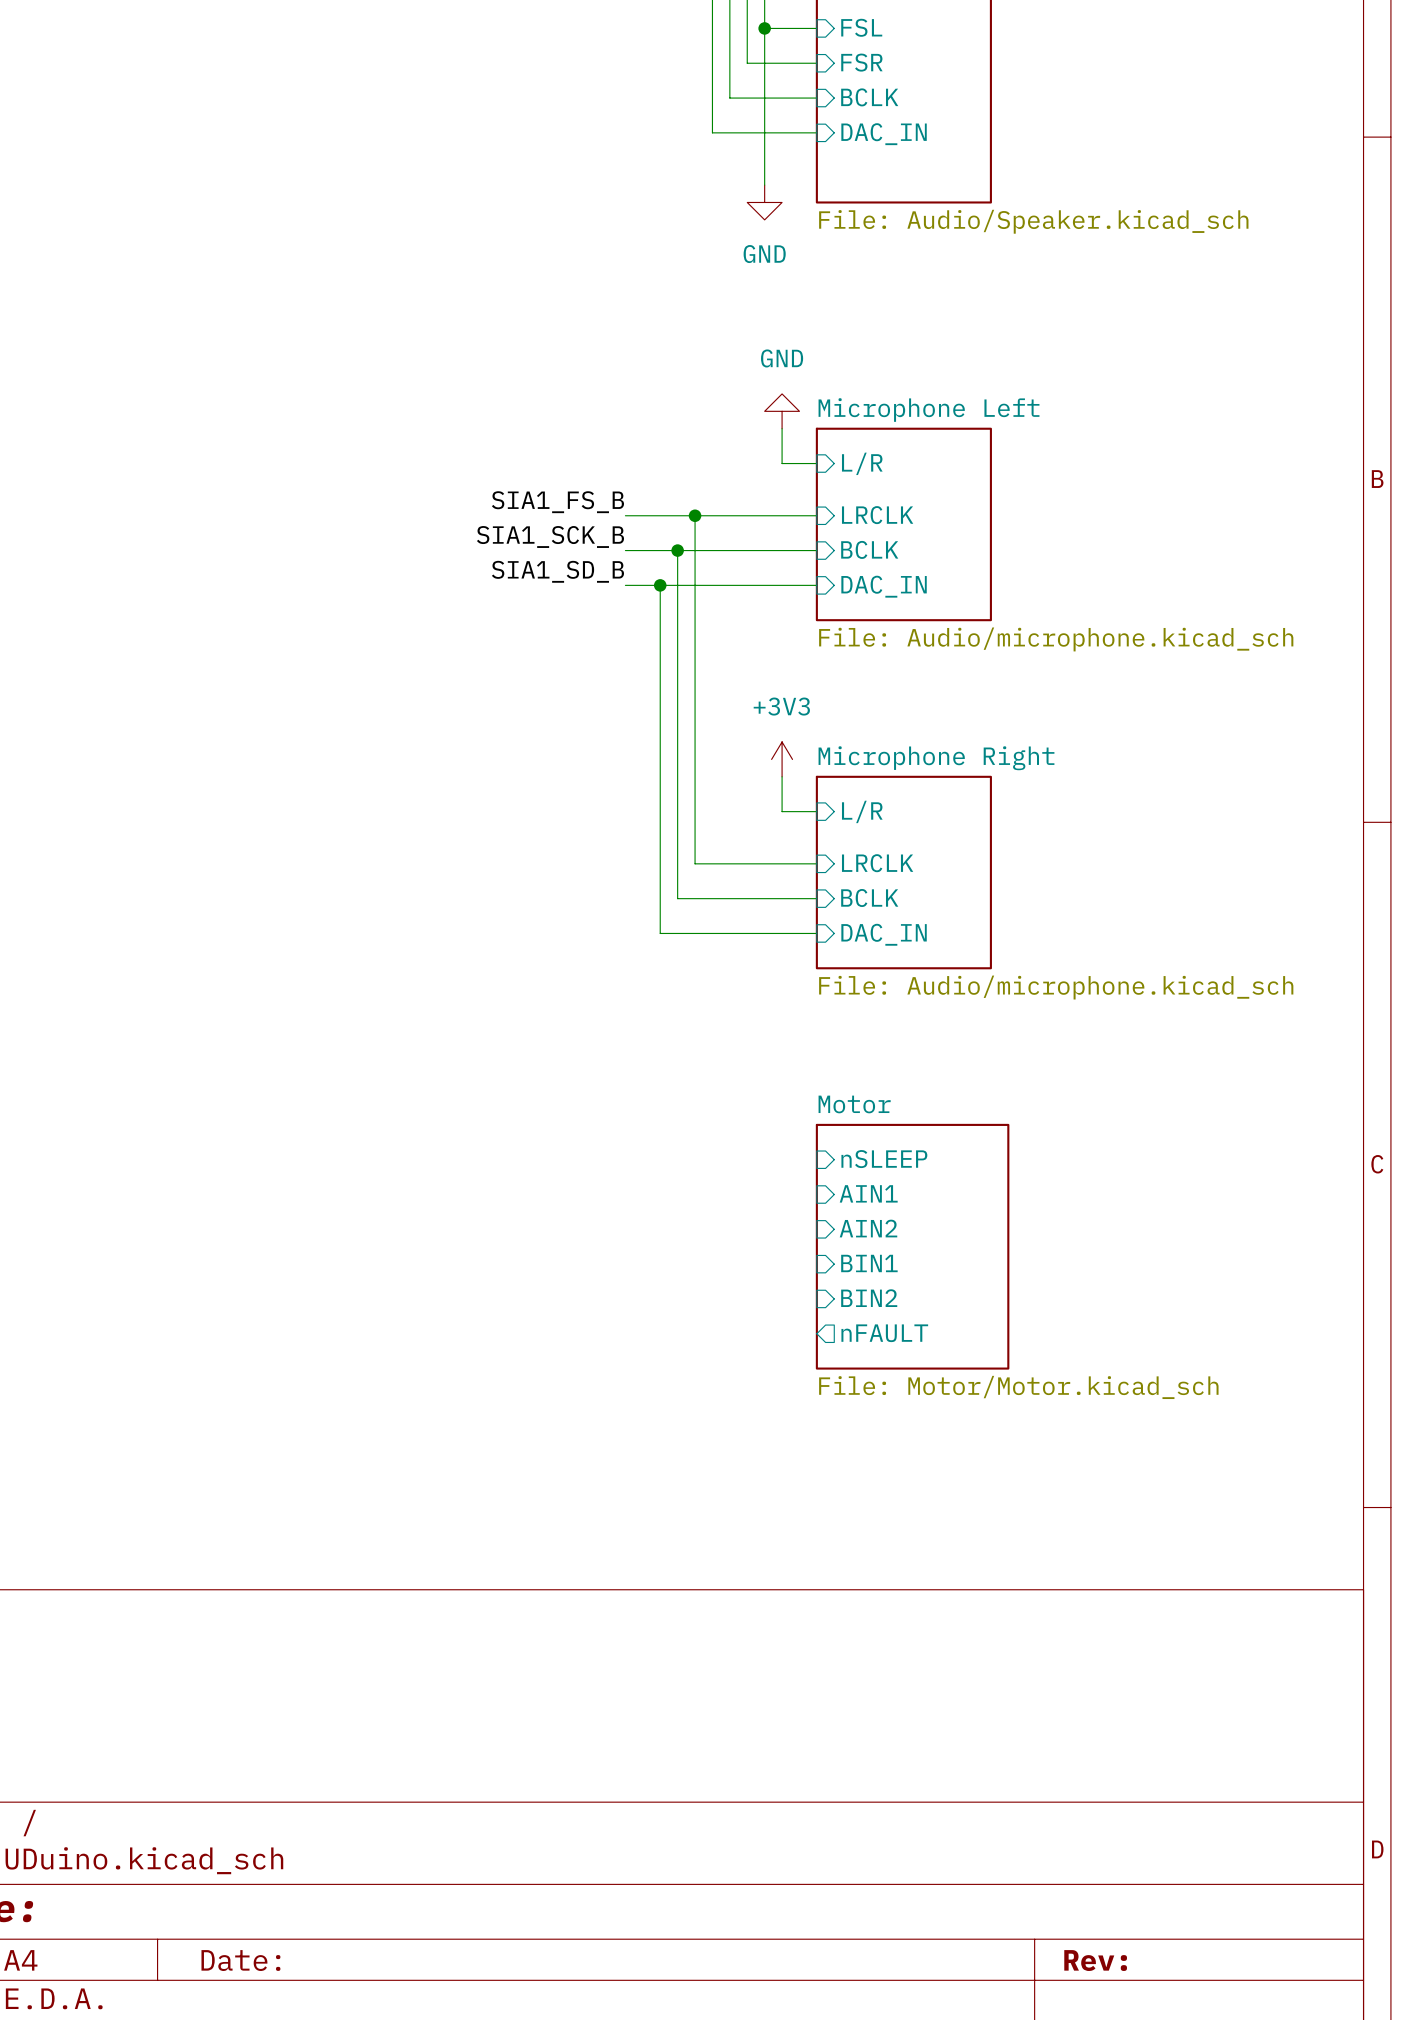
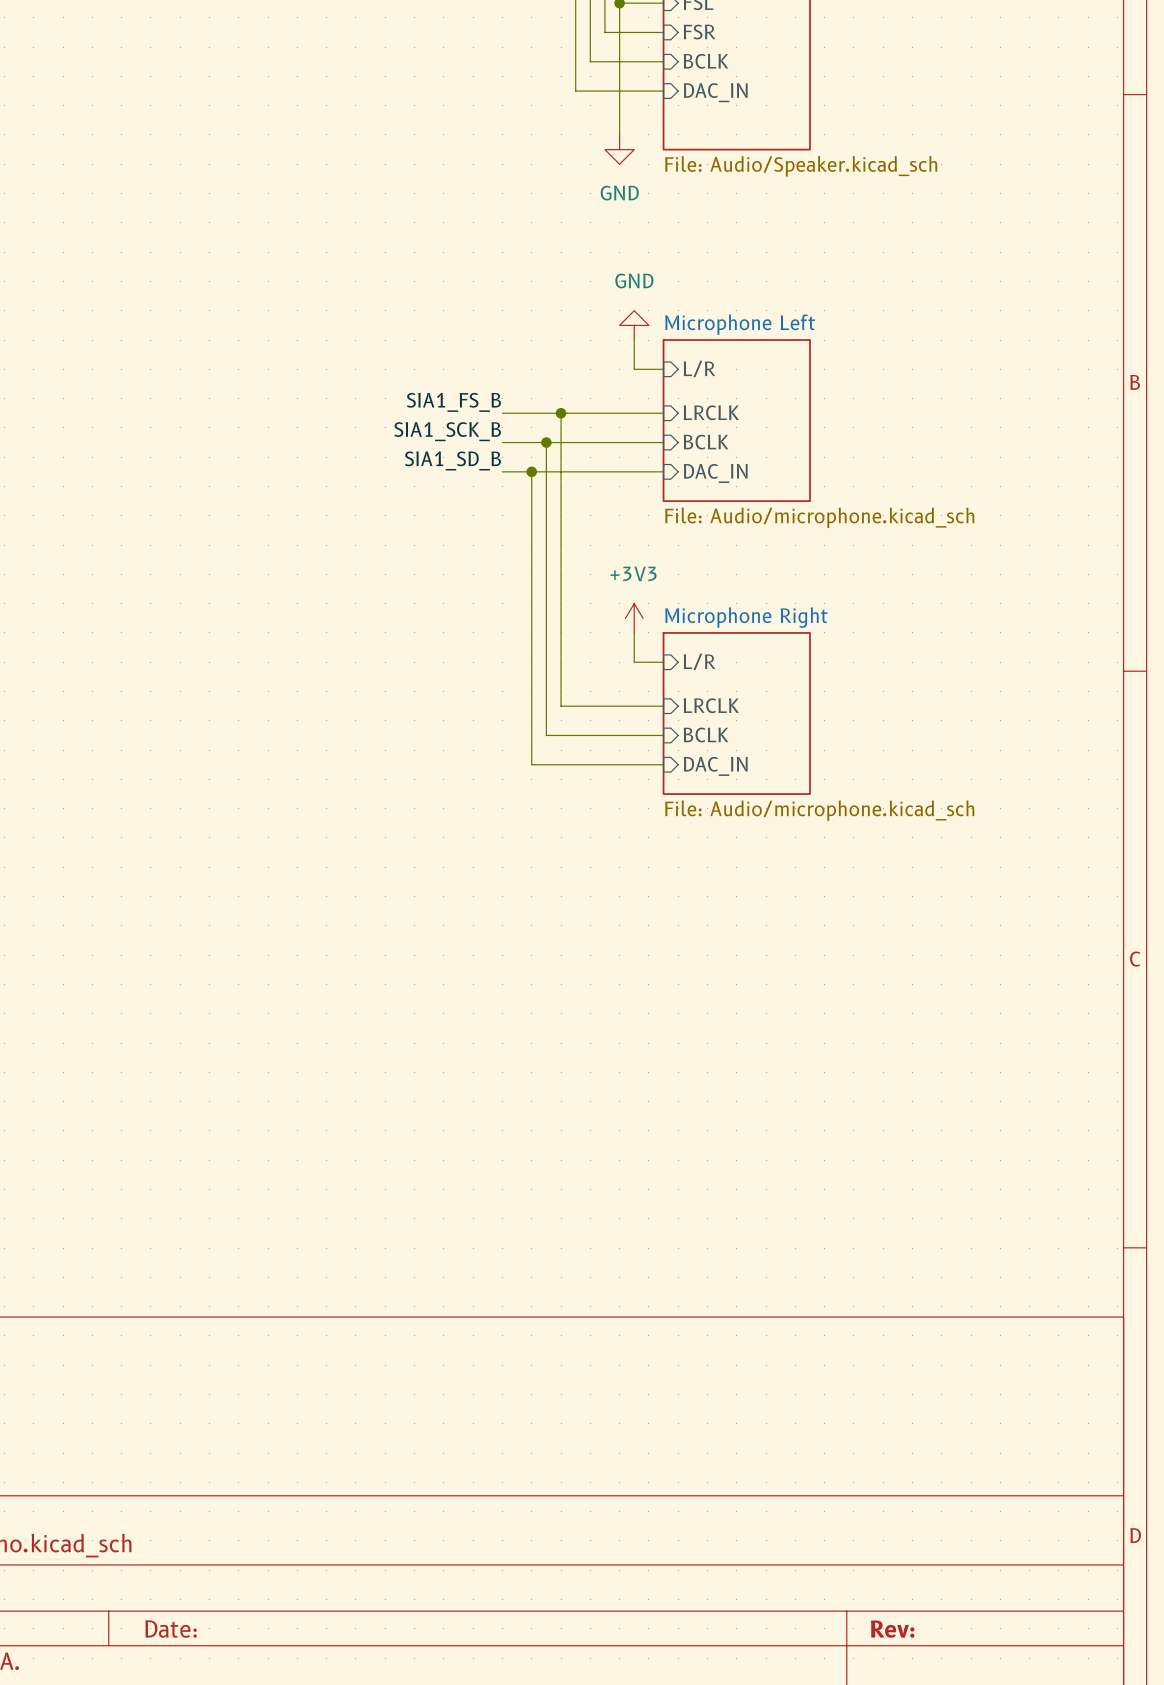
sheet pin: nSLEEP (884, 1159) -> none
sheet pin: AIN1 (868, 1193) -> none
sheet pin: AIN2 (868, 1228) -> none
sheet Motor: File: Motor/Motor.kicad_sch (912, 1246) -> none
sheet pin: BIN1 (869, 1263) -> none
sheet pin: BIN2 (869, 1298) -> none
sheet pin: nFAULT (884, 1333) -> none

